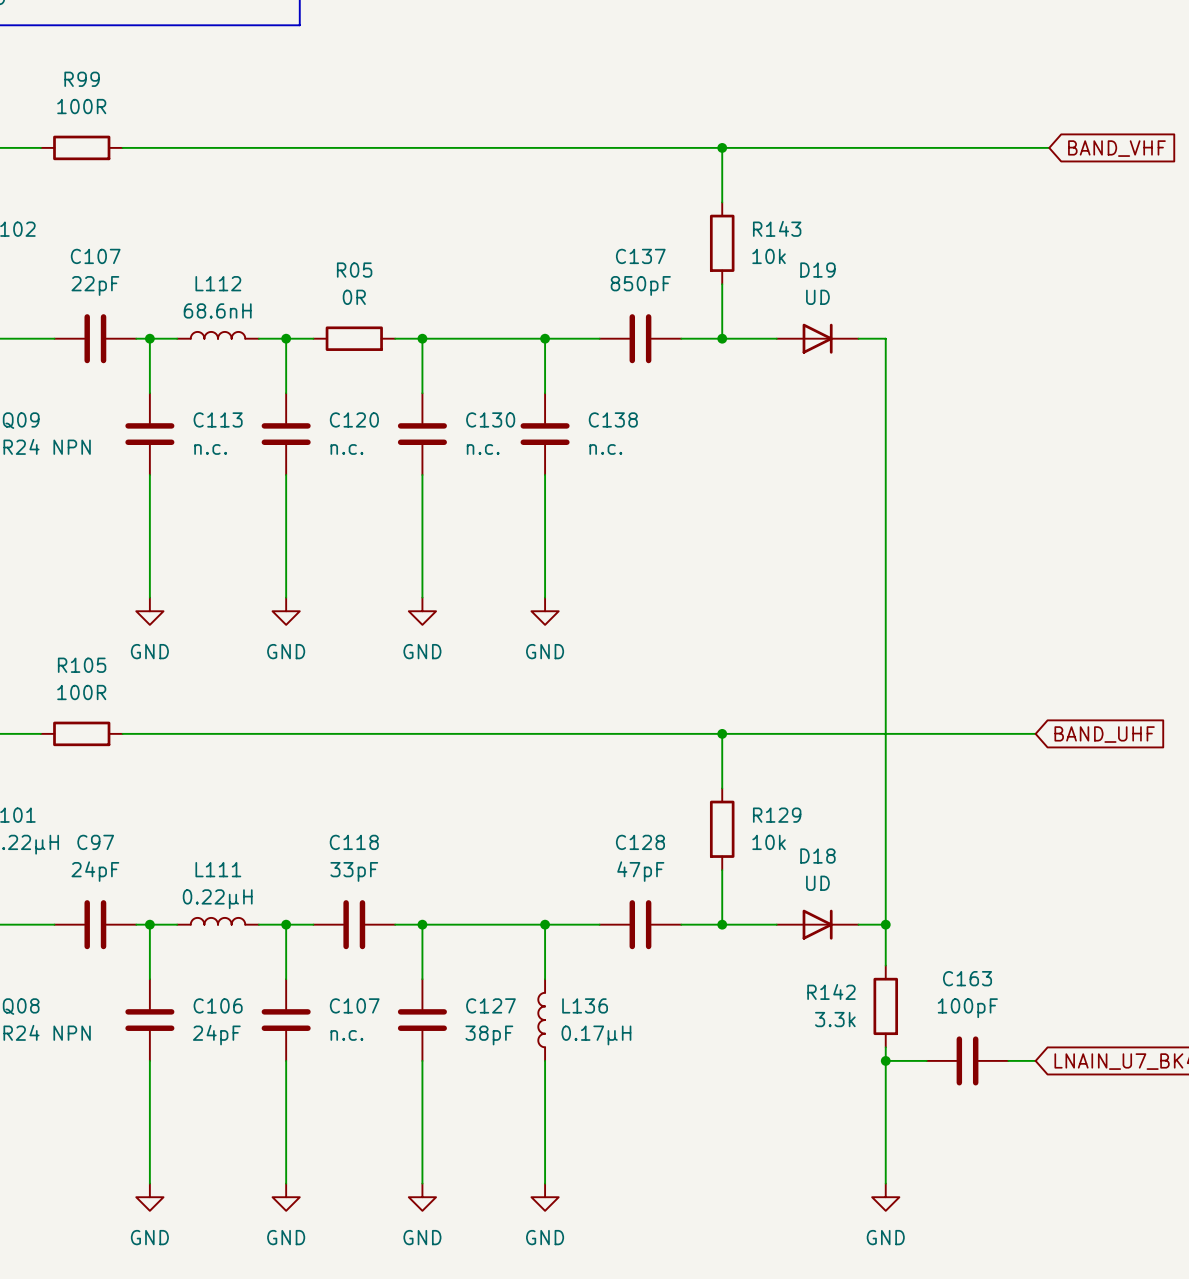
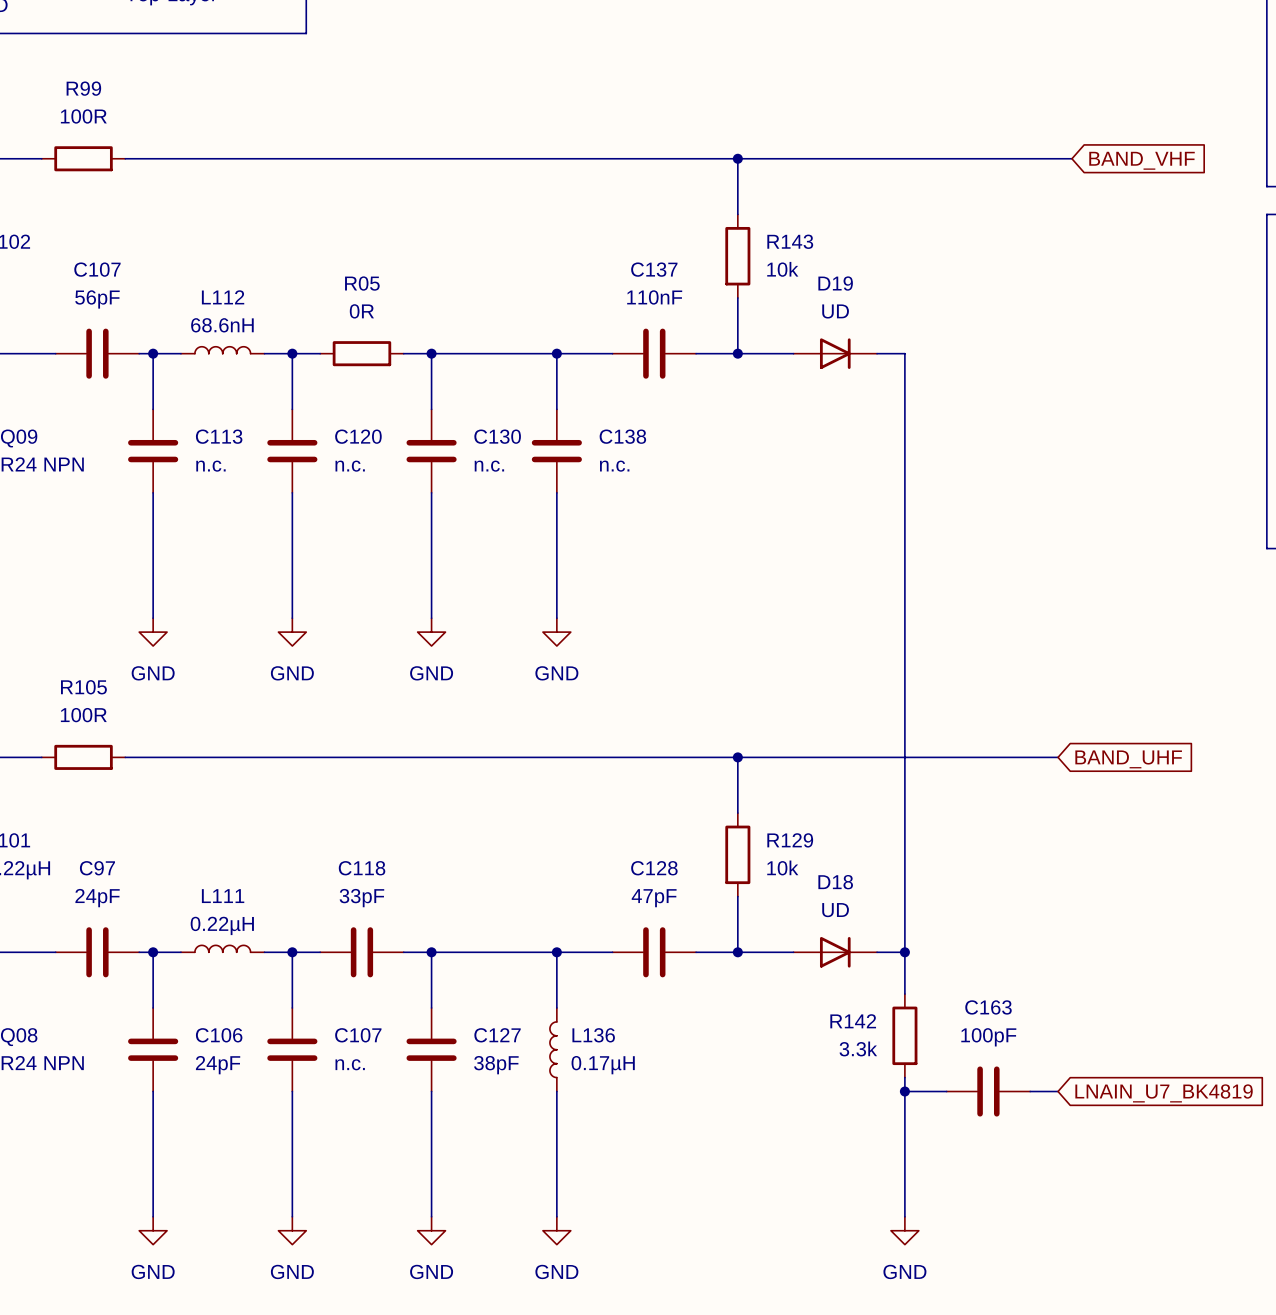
C107 value: 22pF (95, 285) -> 56pF (97, 299)
C137 value: 850pF (640, 285) -> 110nF (654, 297)

